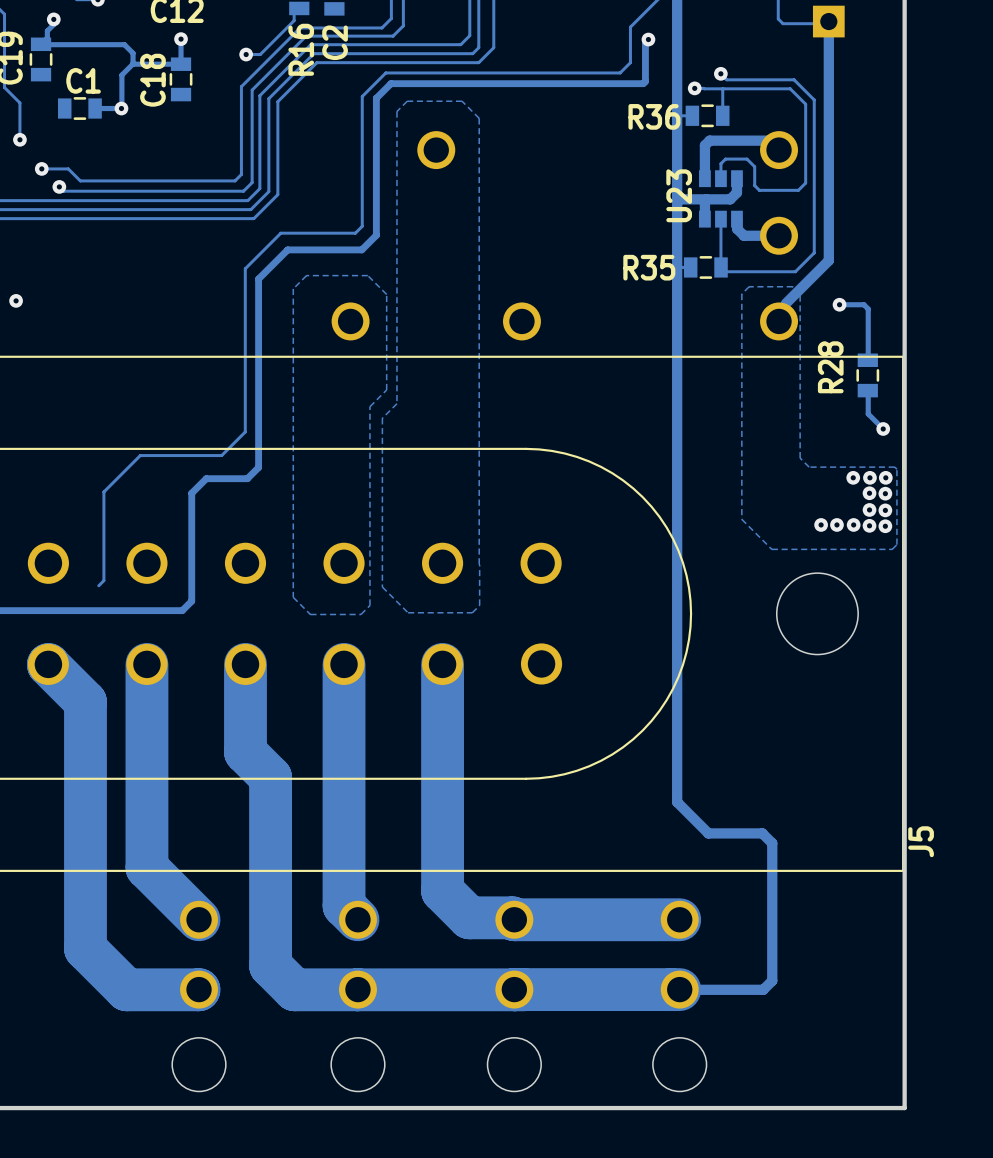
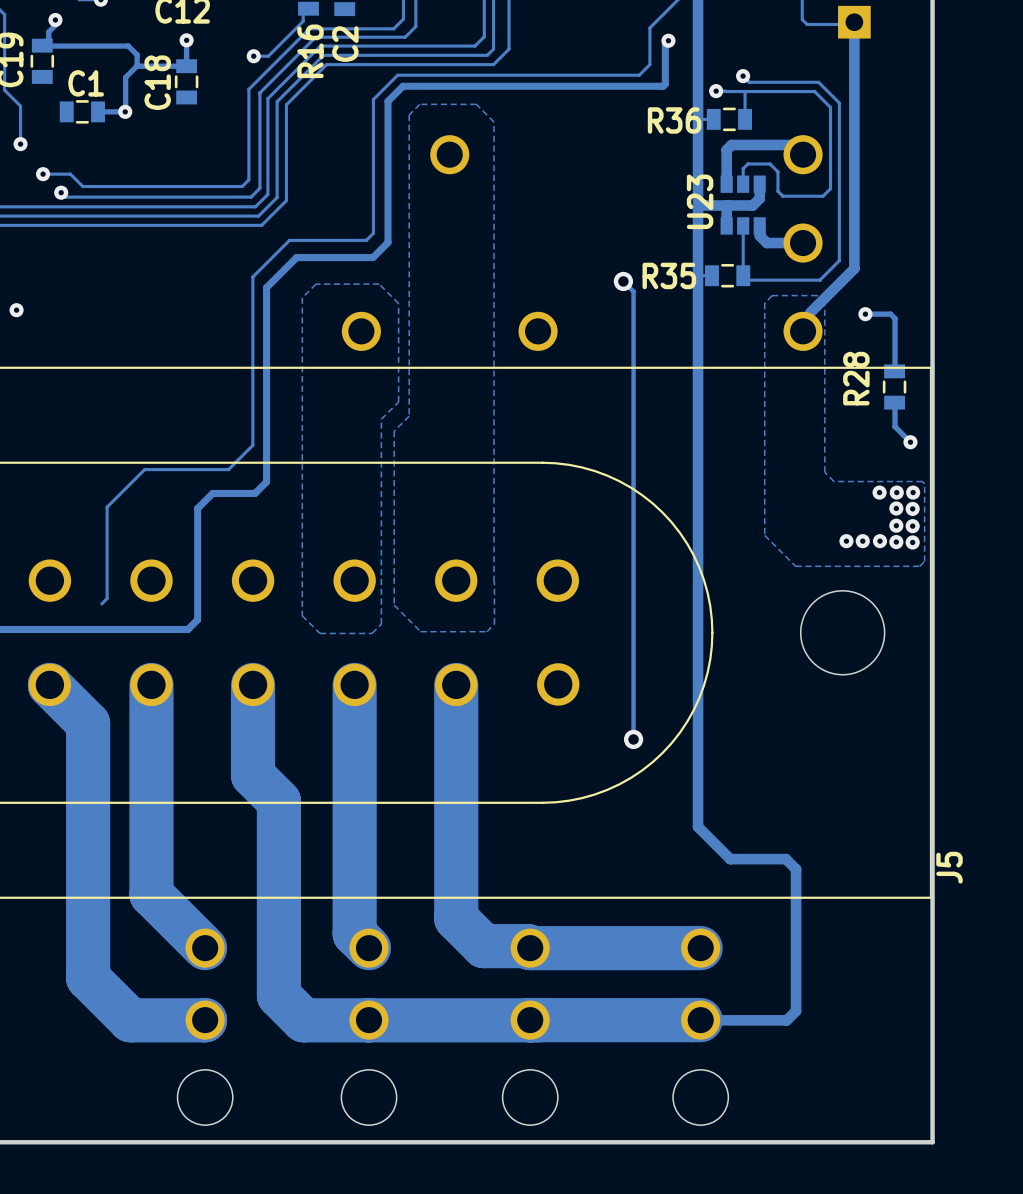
track: none -> (623, 281) (633, 291) (633, 739)
via: none -> (623, 281)
via: none -> (633, 739)

